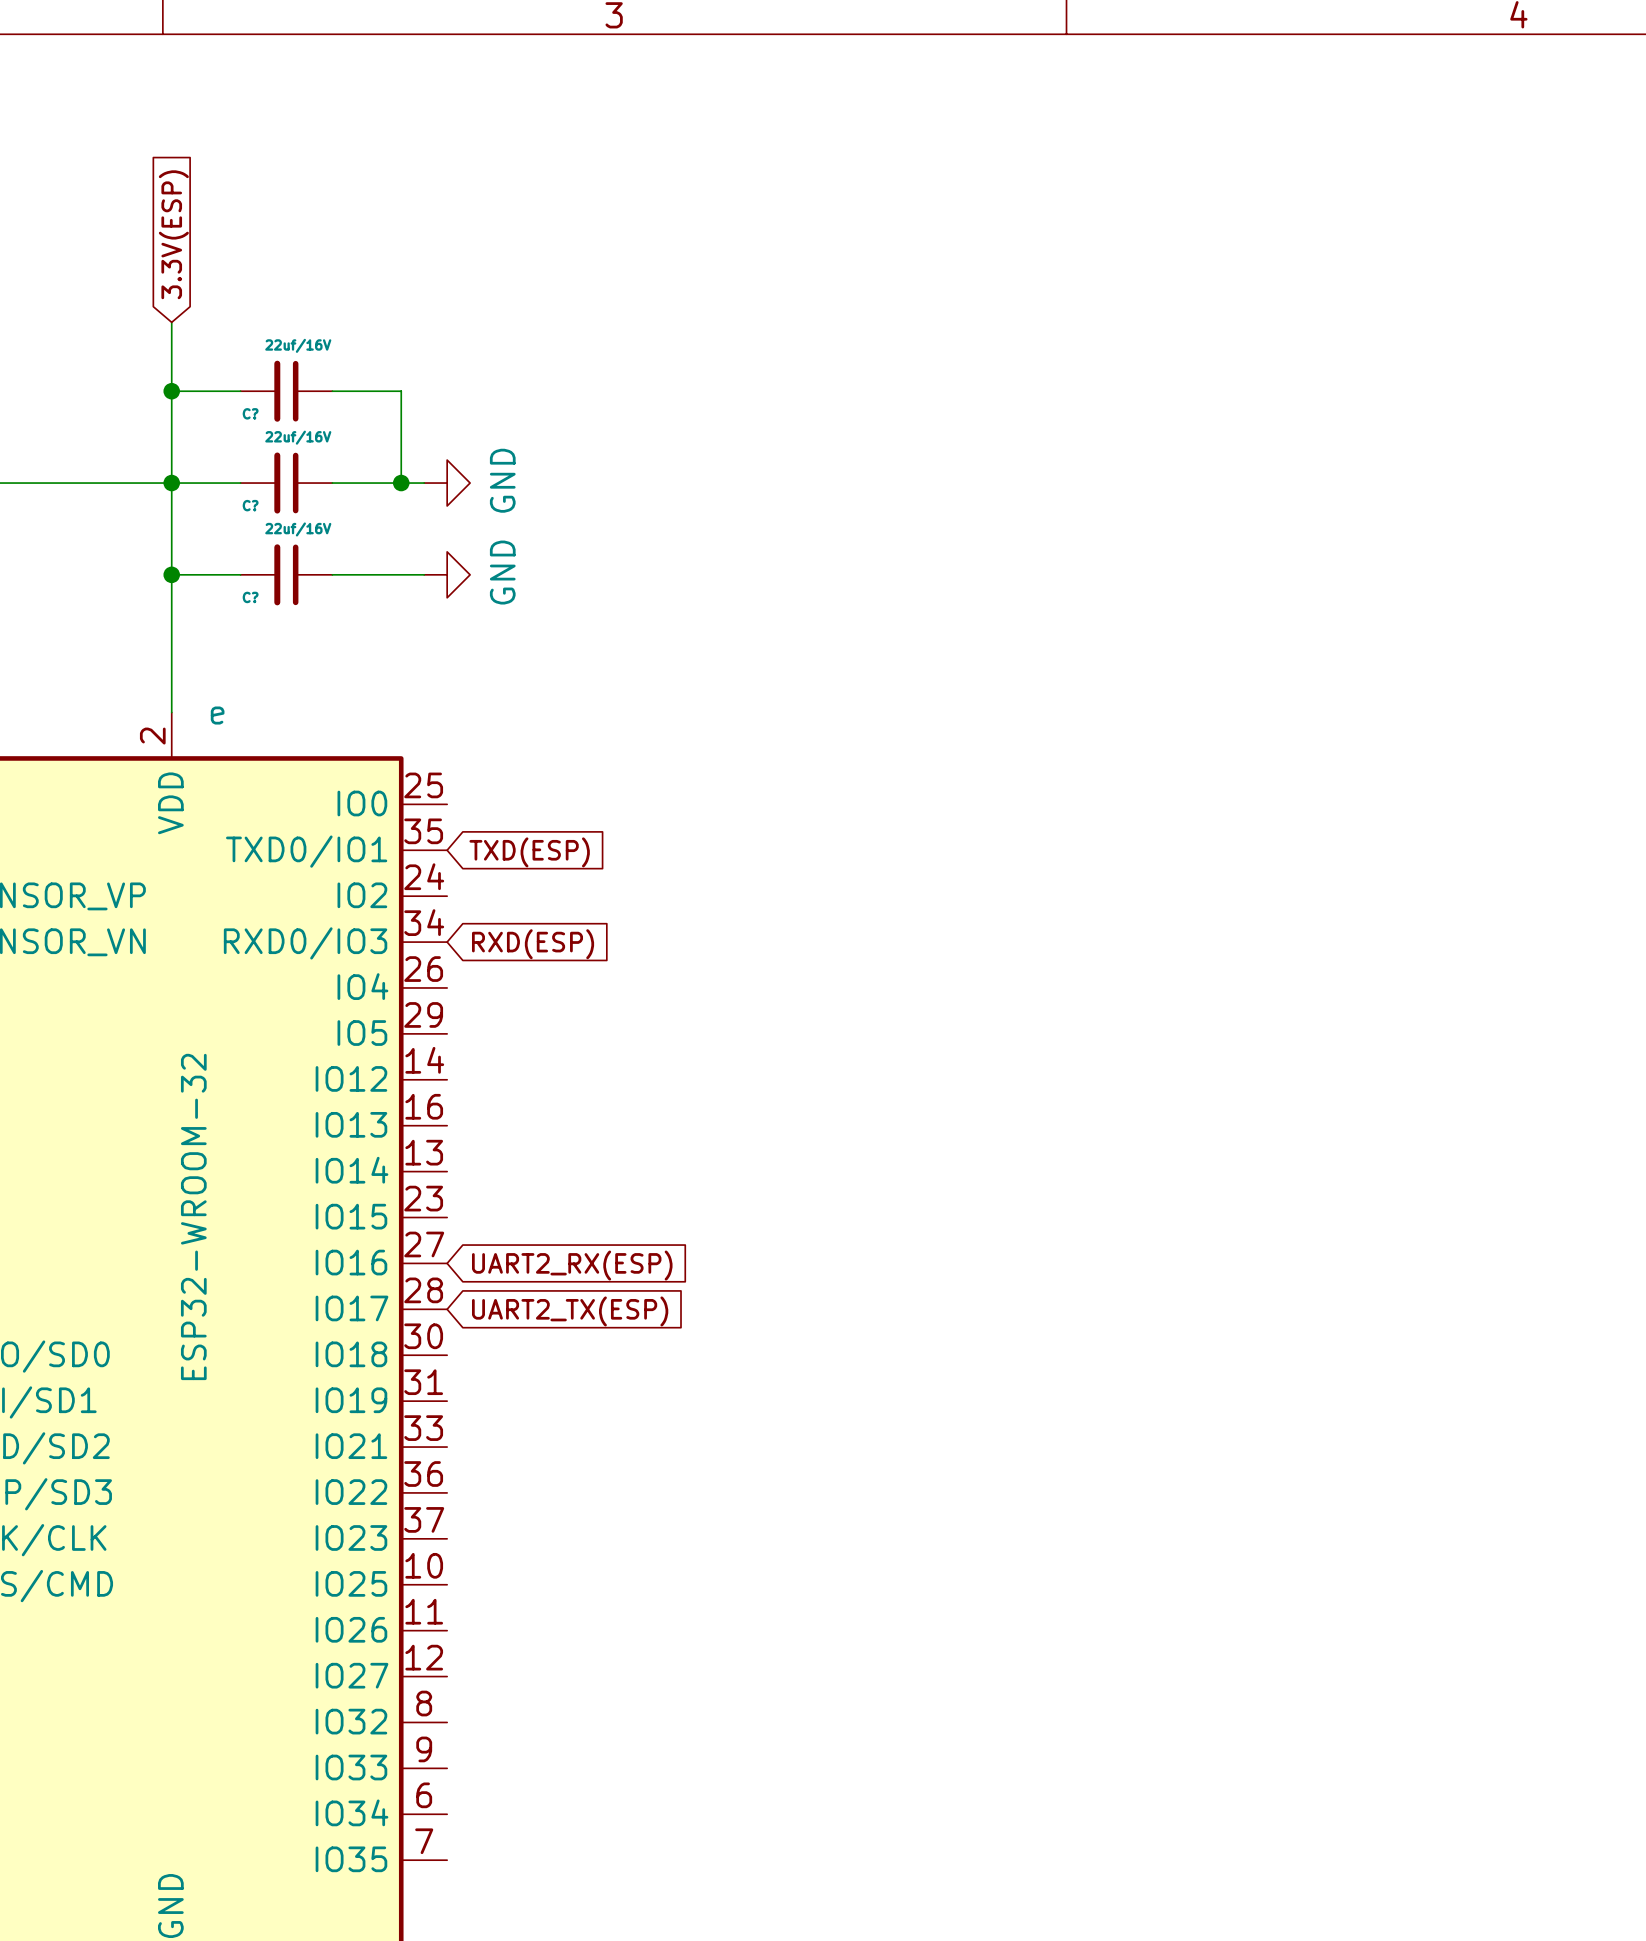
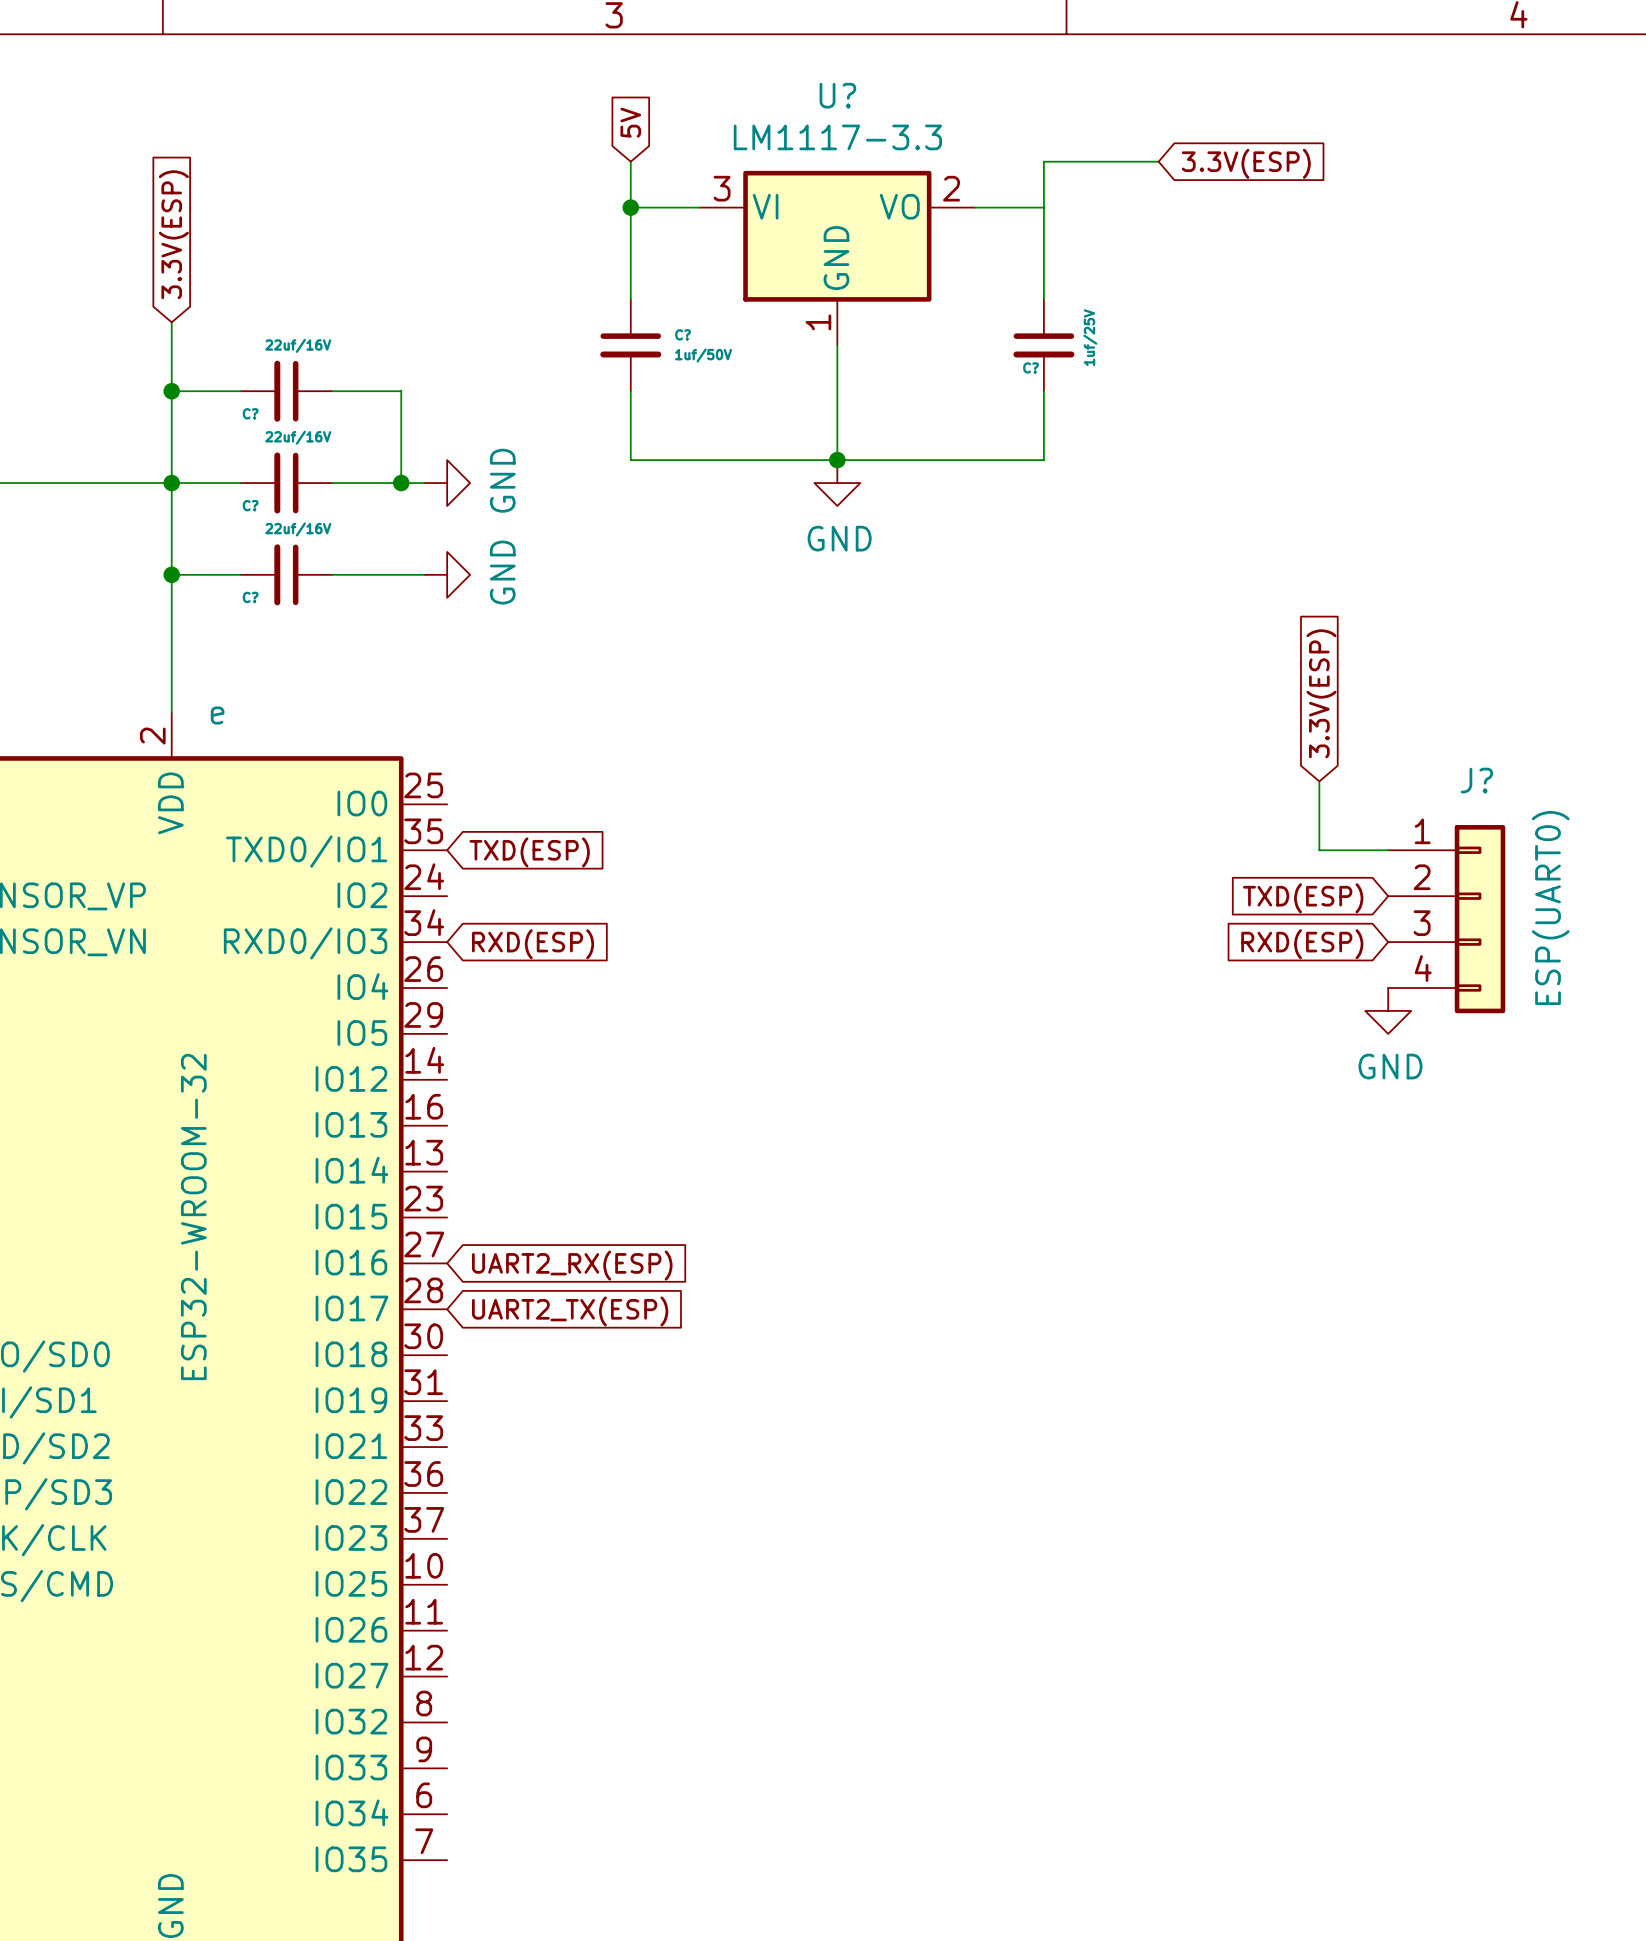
global label: none -> 5V (630, 122)
wire: none -> (630, 161) (630, 299)
wire: none -> (1158, 161) (1043, 161) (1043, 299)
global label: none -> 3.3V(ESP) (1246, 163)
wire: none -> (630, 207) (699, 207)
junction: none -> (630, 207)
wire: none -> (975, 207) (1043, 207)
U?: none -> LM1117-3.3 (837, 258)
C?: none -> 1uf/50V (630, 345)
wire: none -> (837, 345) (837, 460)
C?: none -> 1uf/25V (1043, 345)
wire: none -> (630, 391) (630, 460) (1043, 460) (1043, 391)
junction: none -> (837, 460)
power symbol: none -> GND (837, 483)
global label: none -> 3.3V(ESP) (1321, 693)
wire: none -> (1319, 781) (1319, 850) (1388, 850)
global label: none -> TXD(ESP) (1303, 898)
J?: none -> ESP(UART0) (1446, 919)
global label: none -> RXD(ESP) (1302, 944)
power symbol: none -> GND (1388, 1010)

